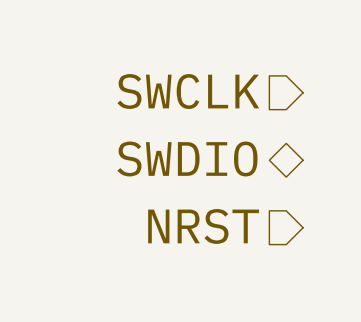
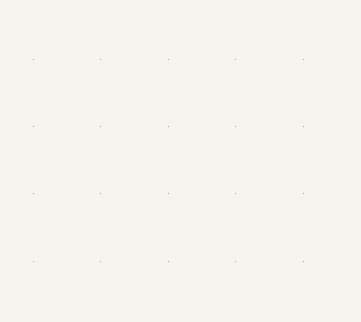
hierarchical label: SWCLK (188, 91) -> none
hierarchical label: SWDIO (187, 158) -> none
hierarchical label: NRST (203, 226) -> none

